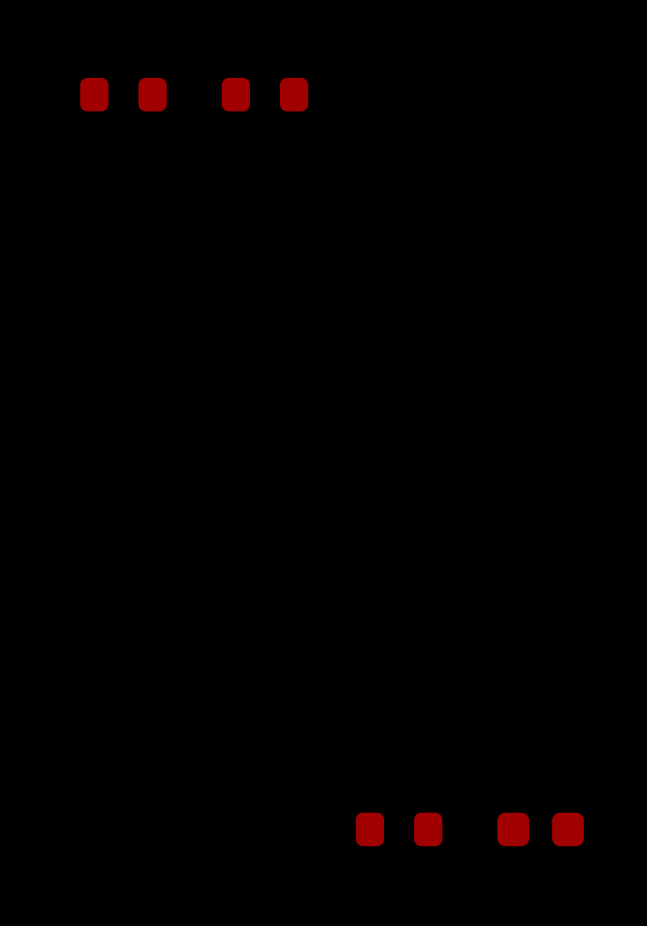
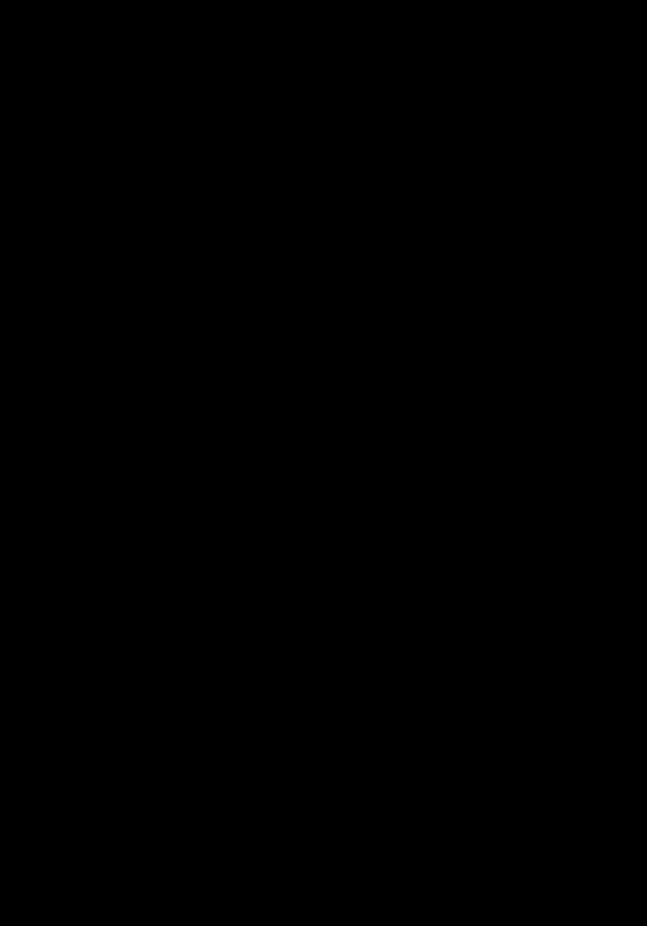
part: (123, 94) -> none
part: (264, 94) -> none
part: (399, 829) -> none
part: (540, 829) -> none

